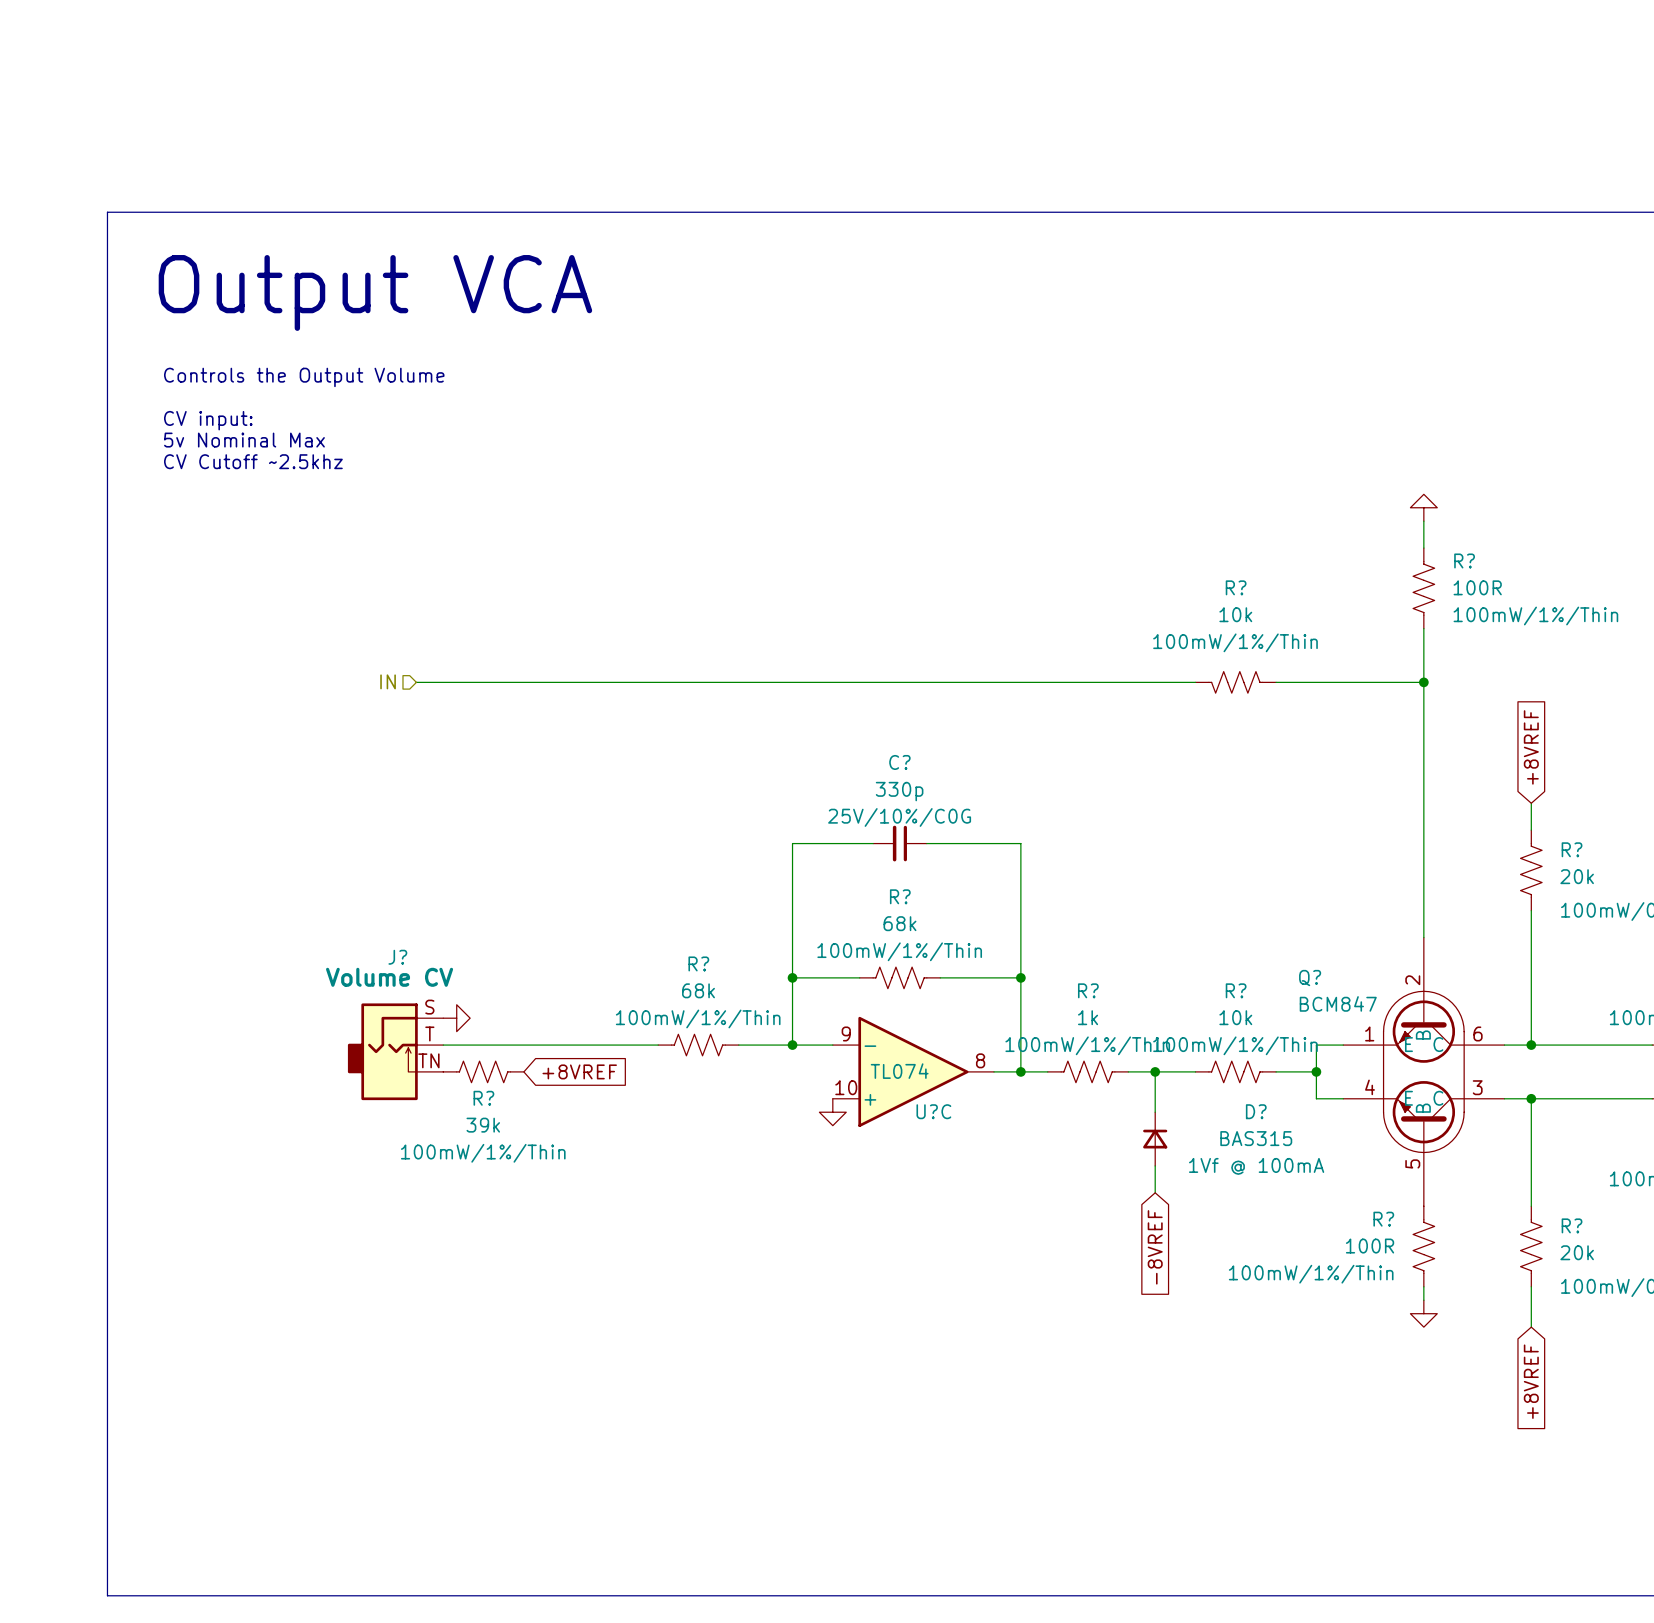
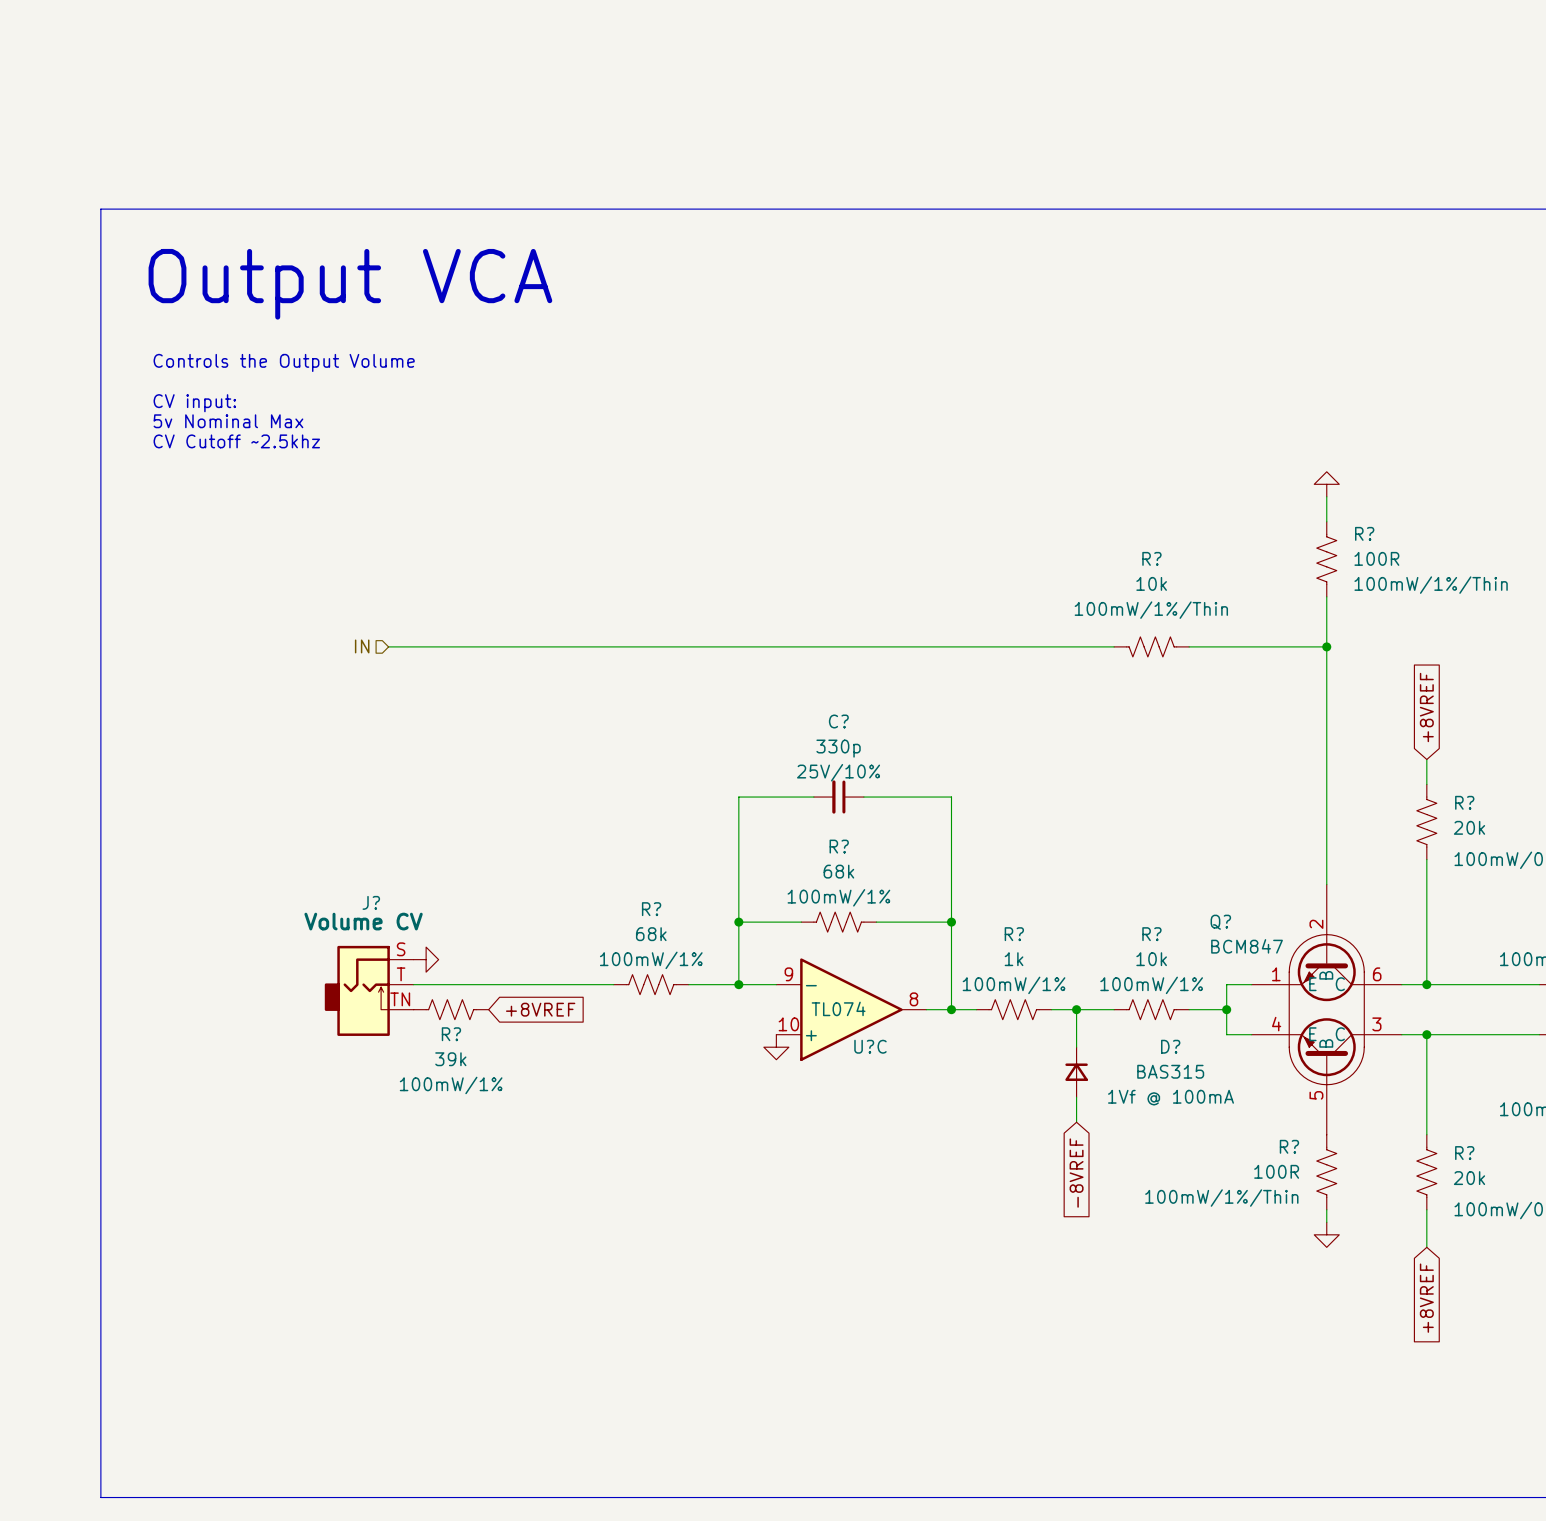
C? text: 25V/10%/C0G (899, 817) -> 25V/10% (838, 772)
R? text: 100mW/1%/Thin (899, 951) -> 100mW/1% (838, 897)
R? text: 100mW/1%/Thin (698, 1018) -> 100mW/1% (651, 960)
R? text: 100mW/1%/Thin (1087, 1045) -> 100mW/1% (1014, 985)
R? text: 100mW/1%/Thin (1235, 1045) -> 100mW/1% (1151, 985)
R? text: 100mW/1%/Thin (483, 1153) -> 100mW/1% (451, 1085)

